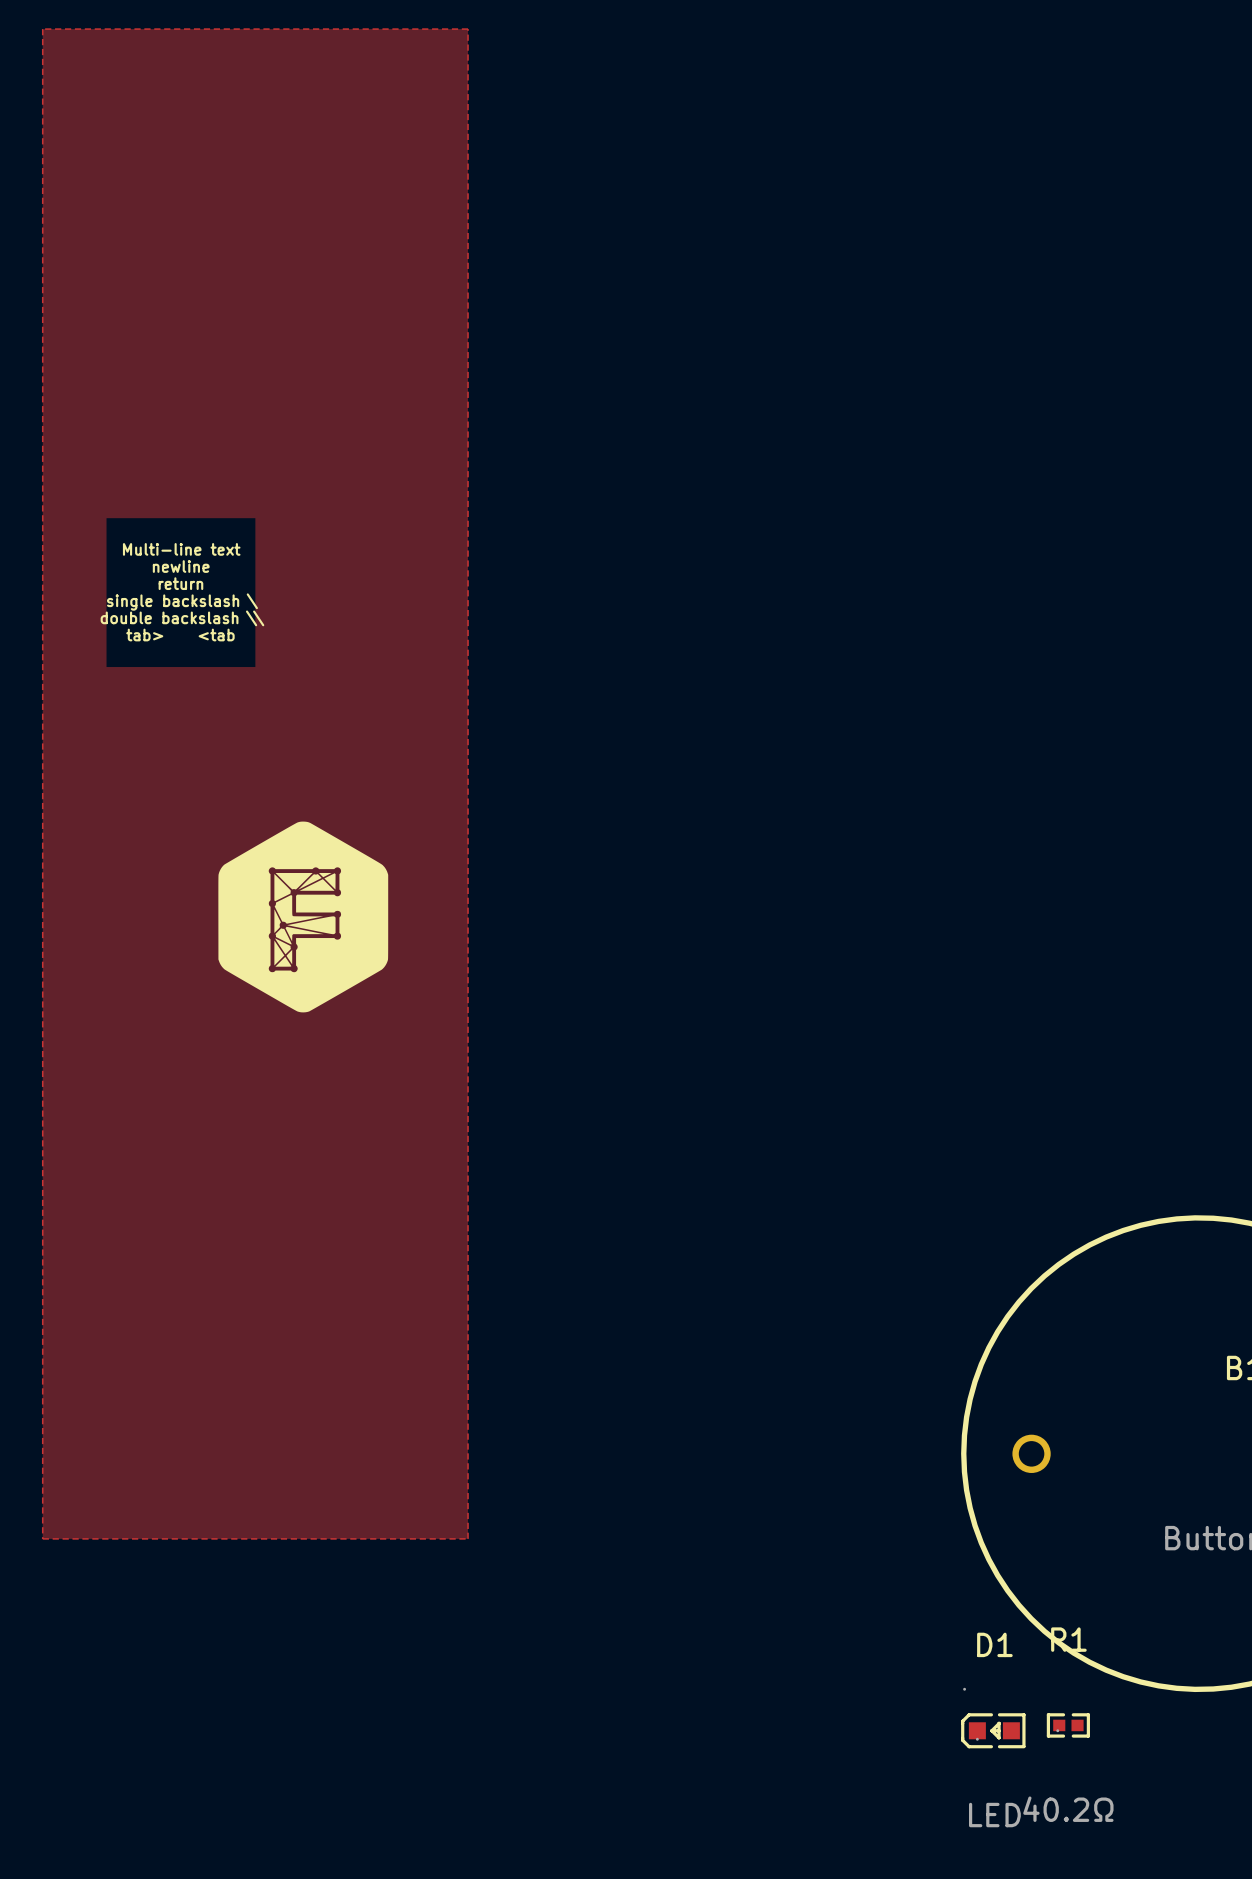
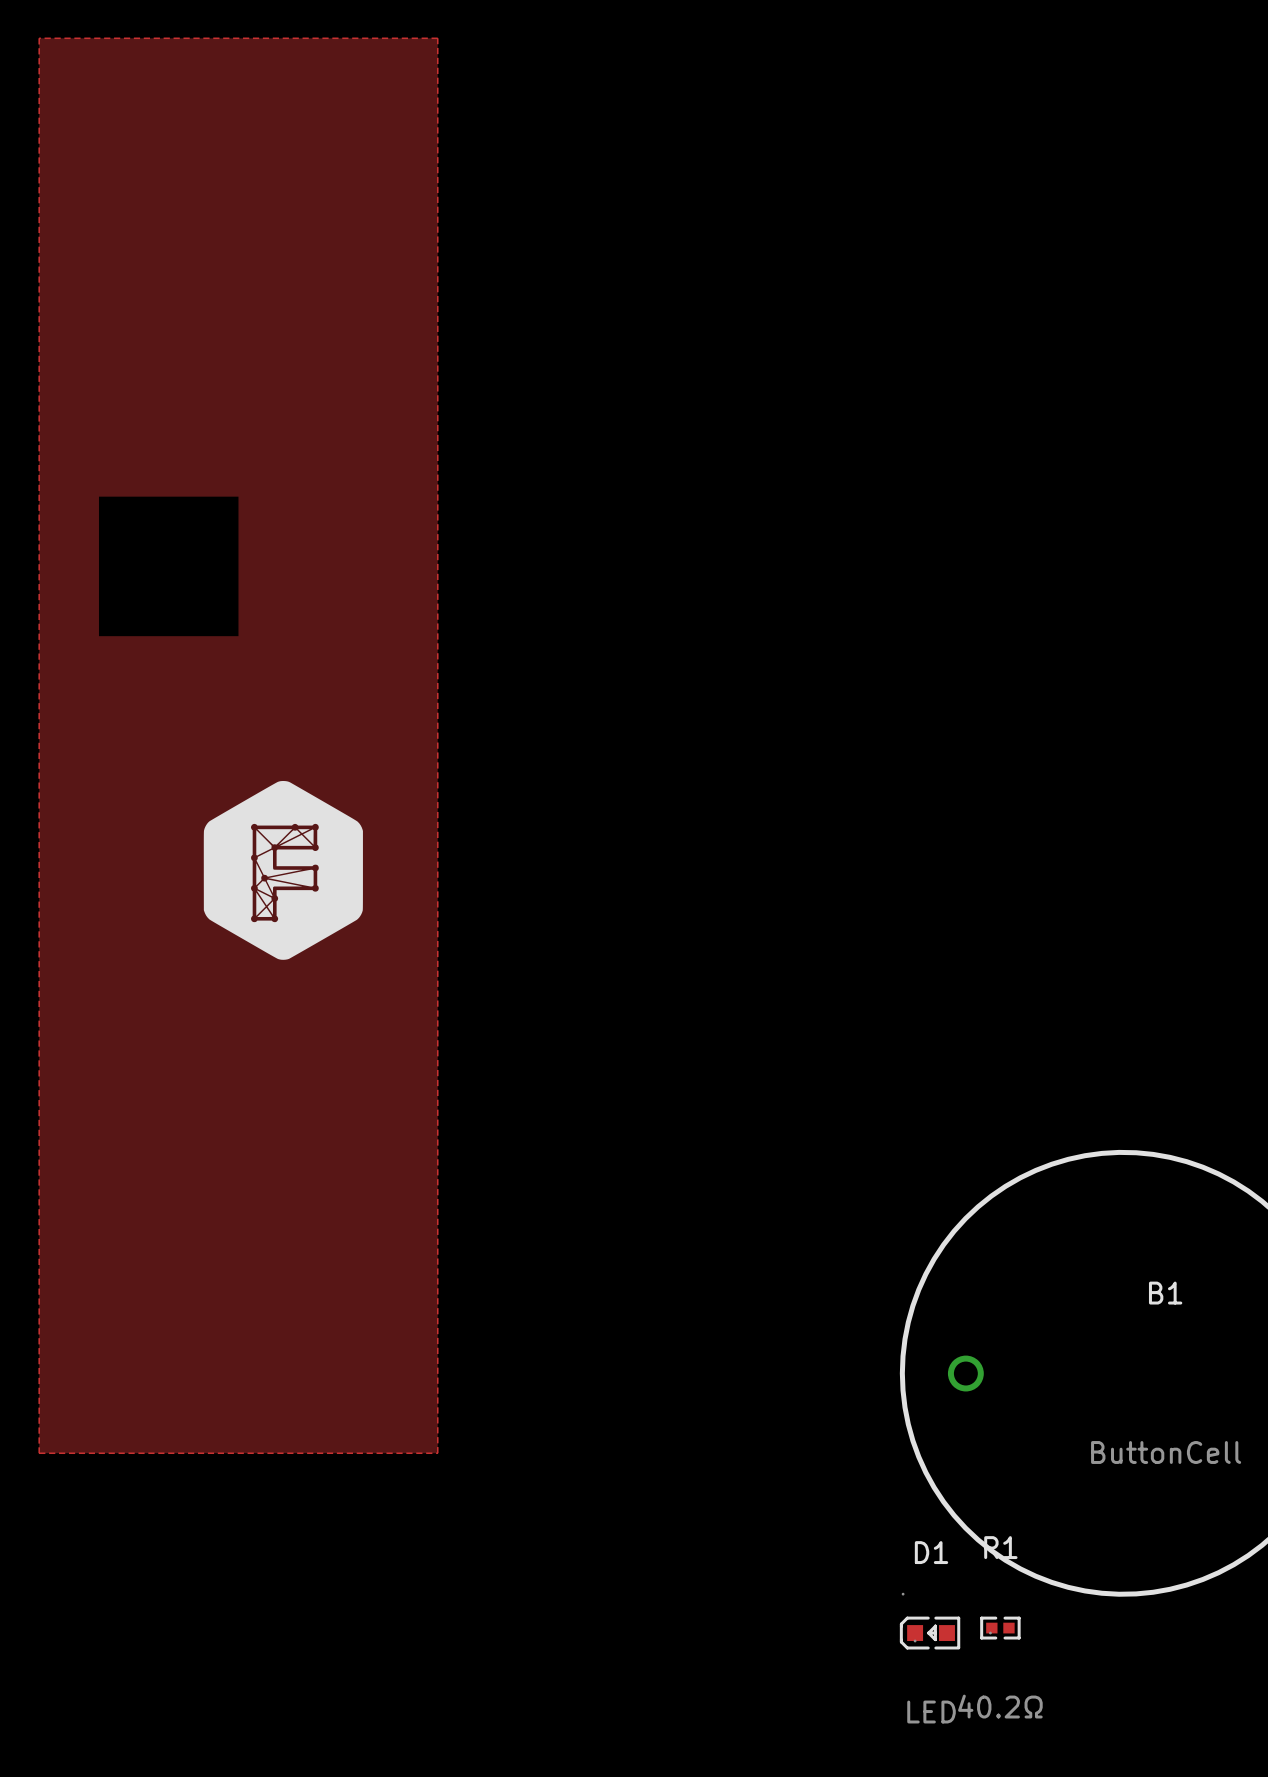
text: Multi-line text (181, 549) -> none
text: newline (181, 566) -> none
text: return (180, 583) -> none
text: single backslash \ (182, 602) -> none
text: double backslash \\ (182, 618) -> none
text: tab> <tab (180, 635) -> none

